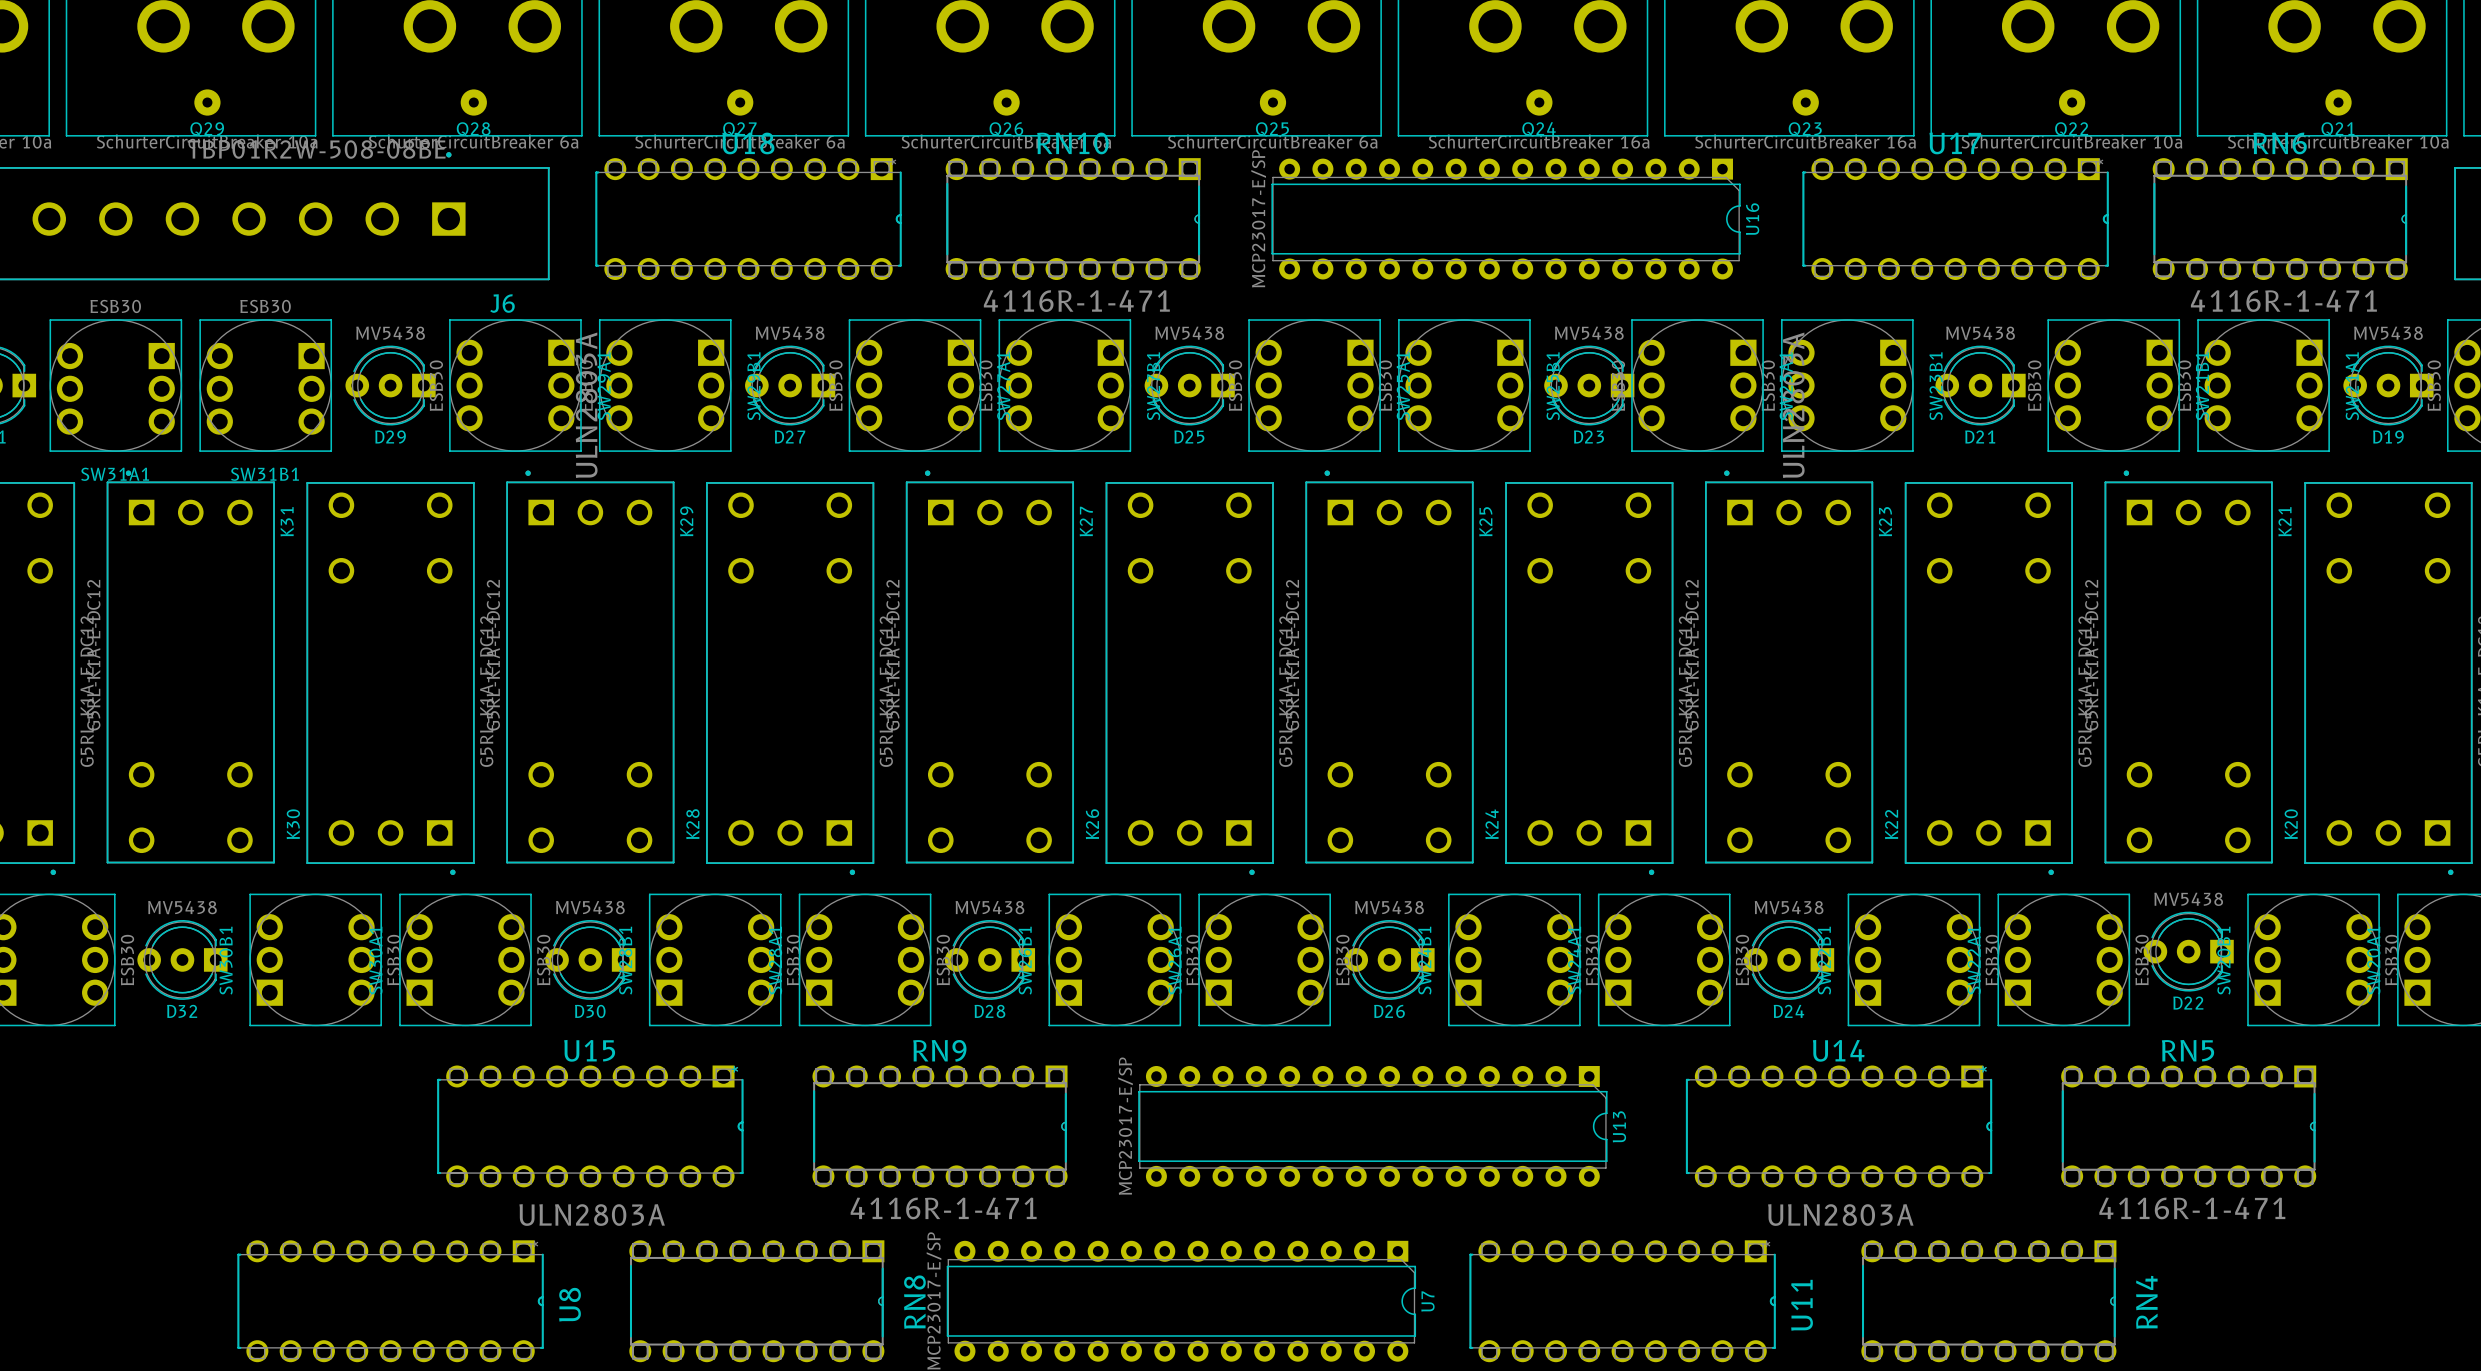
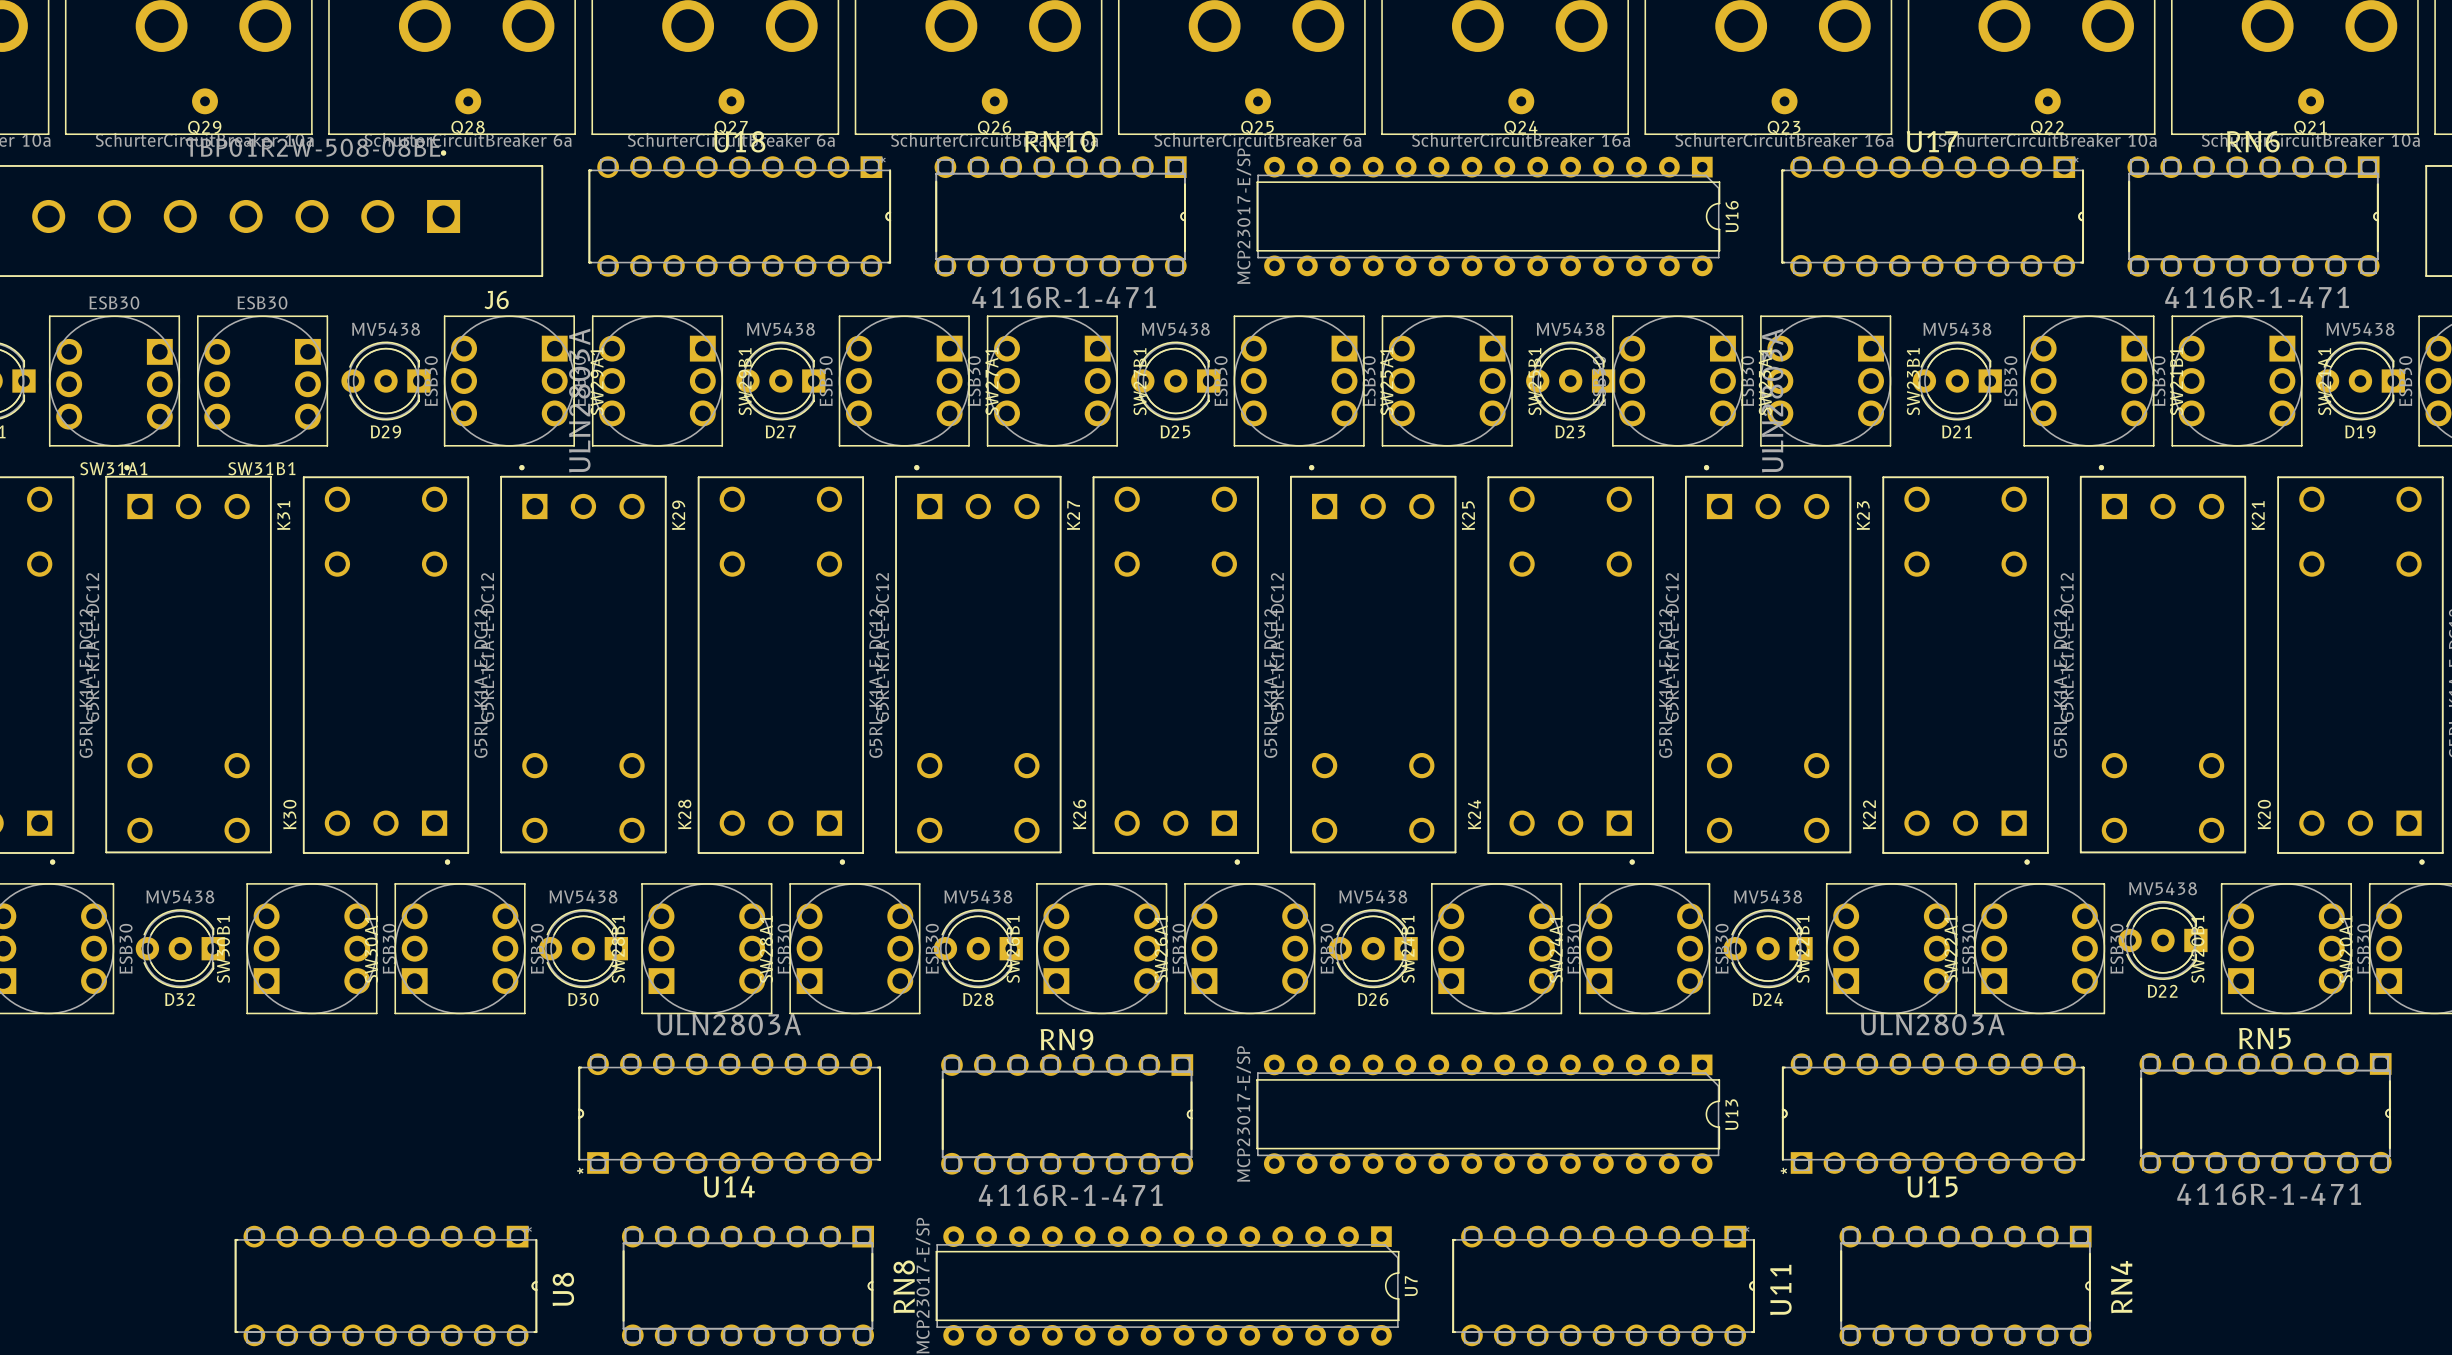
U15 rotation: 0° (590, 1126) -> 180° (1933, 1113)
U15 position: (590, 1126) -> (1933, 1113)
RN9 position: (939, 1126) -> (1067, 1114)
U13 position: (1372, 1126) -> (1488, 1114)
U14 rotation: 0° (1839, 1126) -> 180° (729, 1113)
U14 position: (1839, 1126) -> (729, 1113)
RN5 position: (2188, 1126) -> (2265, 1113)

